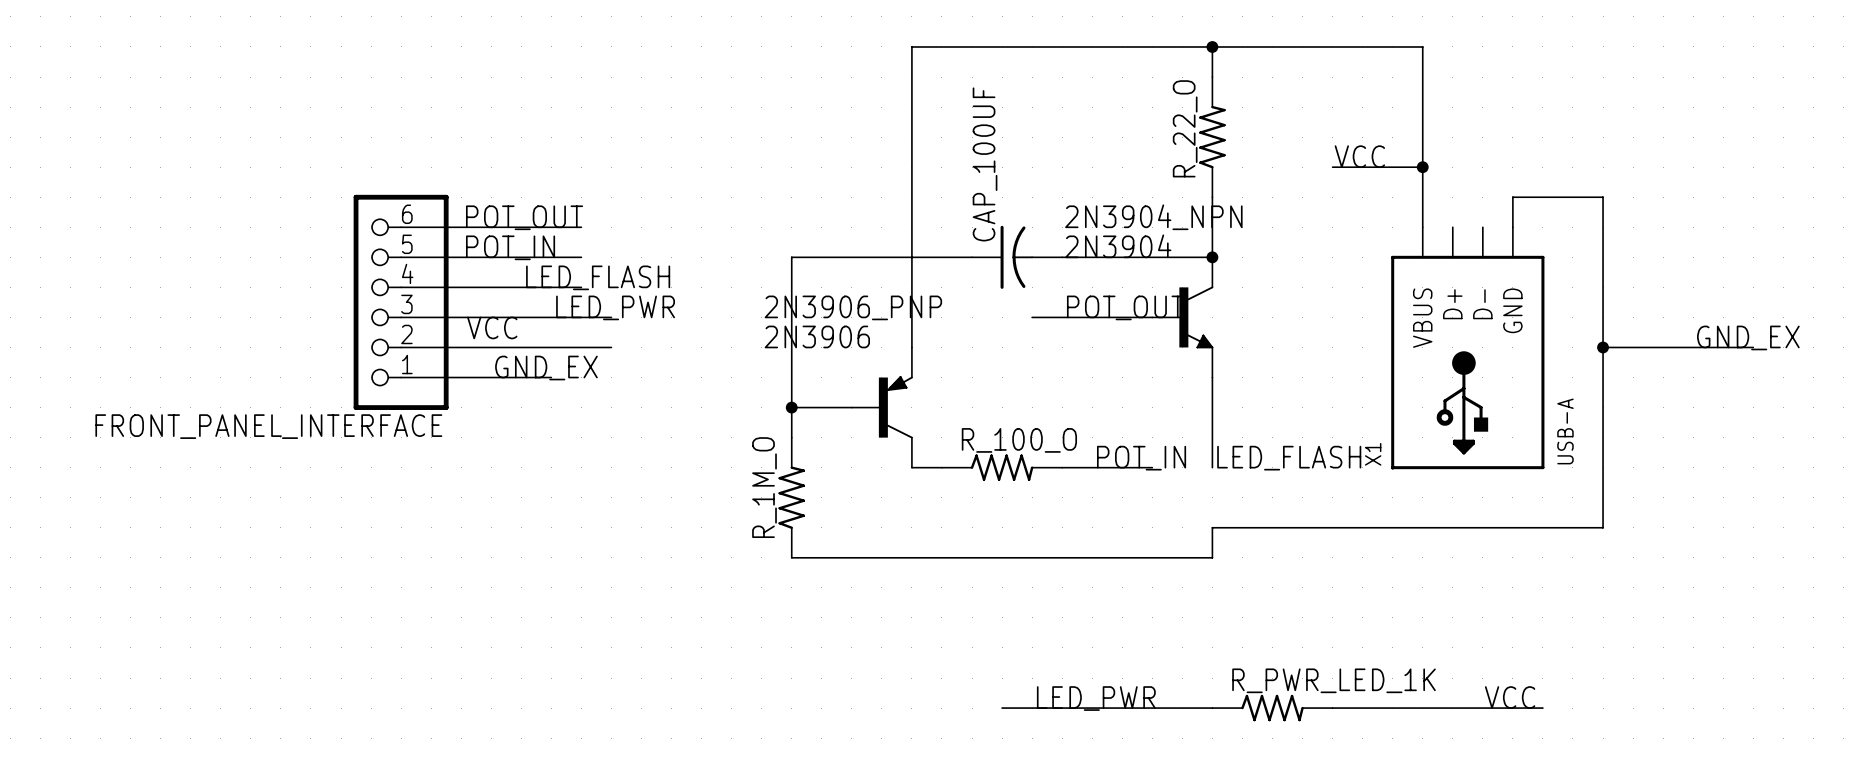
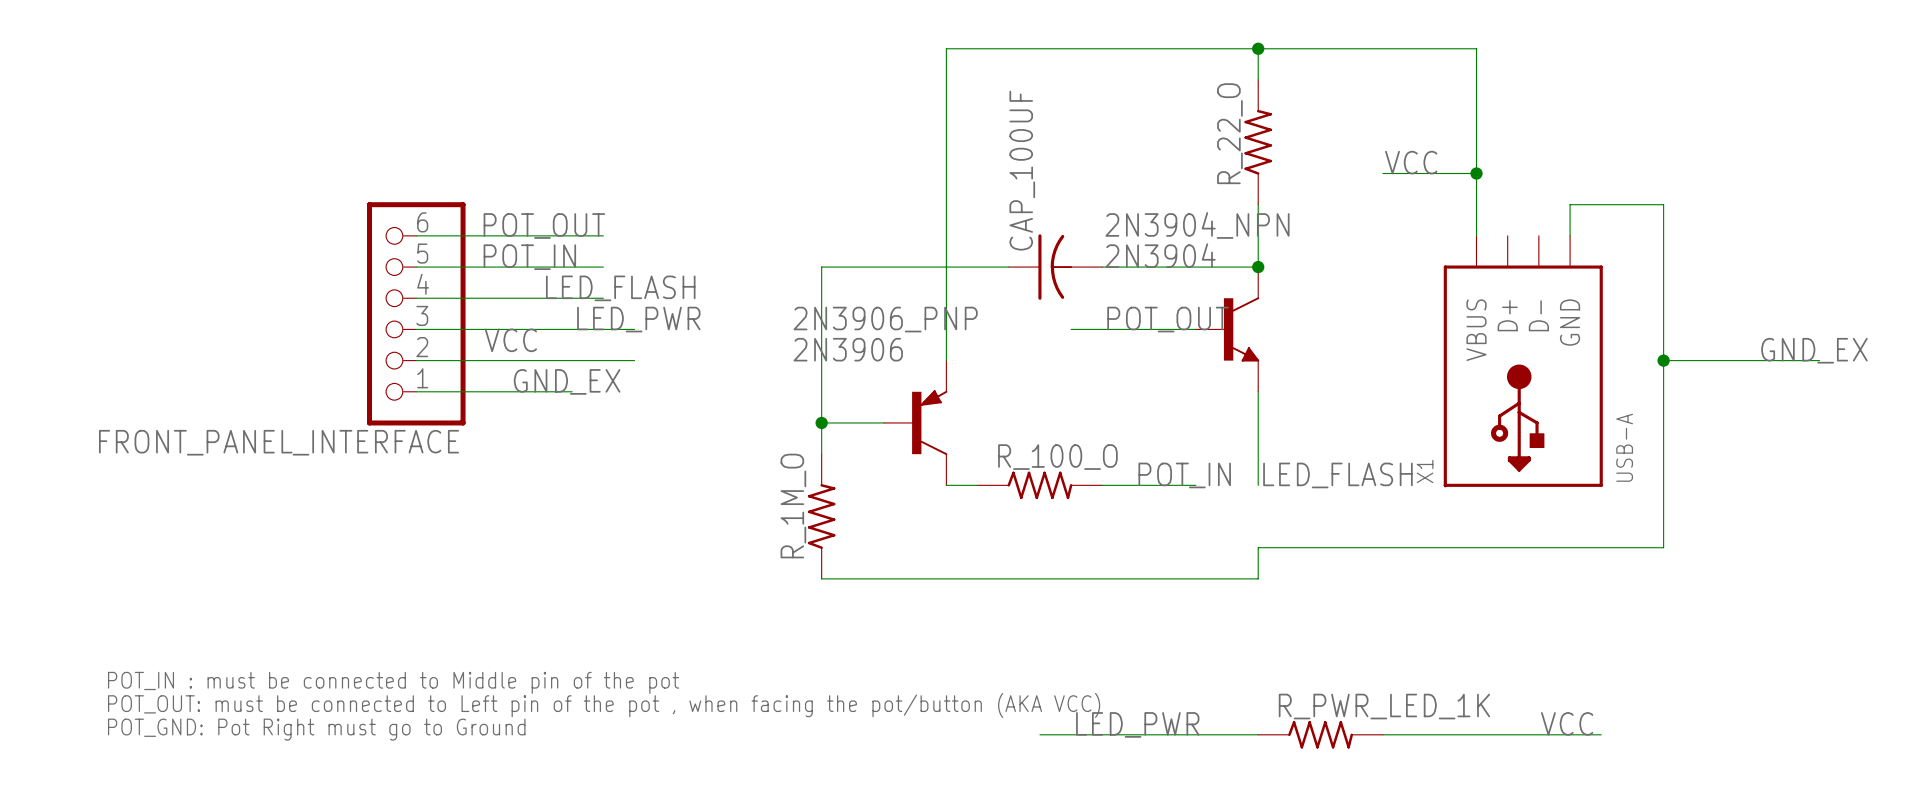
text: none -> POT_IN : must be connected to Middle pin of the pot (393, 682)
text: none -> POT_OUT: must be connected to Left pin of the pot , when facing the pot/button (AKA VCC) (604, 705)
text: none -> POT_GND: Pot Right must go to Ground (316, 729)

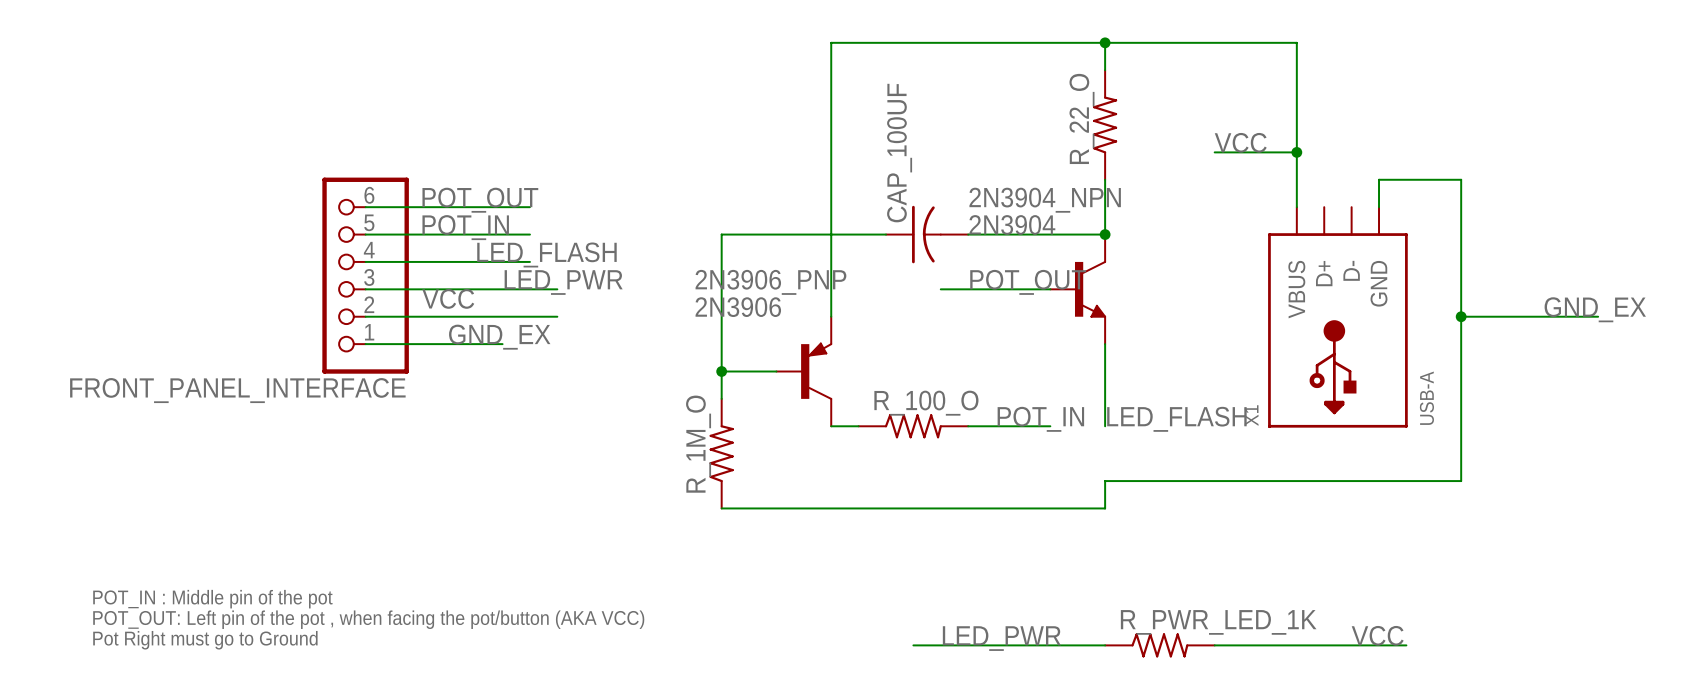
text: POT_IN : must be connected to Middle pin of the pot (393, 682) -> POT_IN : Middle pin of the pot (212, 599)
text: POT_OUT: must be connected to Left pin of the pot , when facing the pot/button (AKA VCC) (604, 705) -> POT_OUT: Left pin of the pot , when facing the pot/button (AKA VCC) (368, 619)
text: POT_GND: Pot Right must go to Ground (316, 729) -> Pot Right must go to Ground (205, 640)

